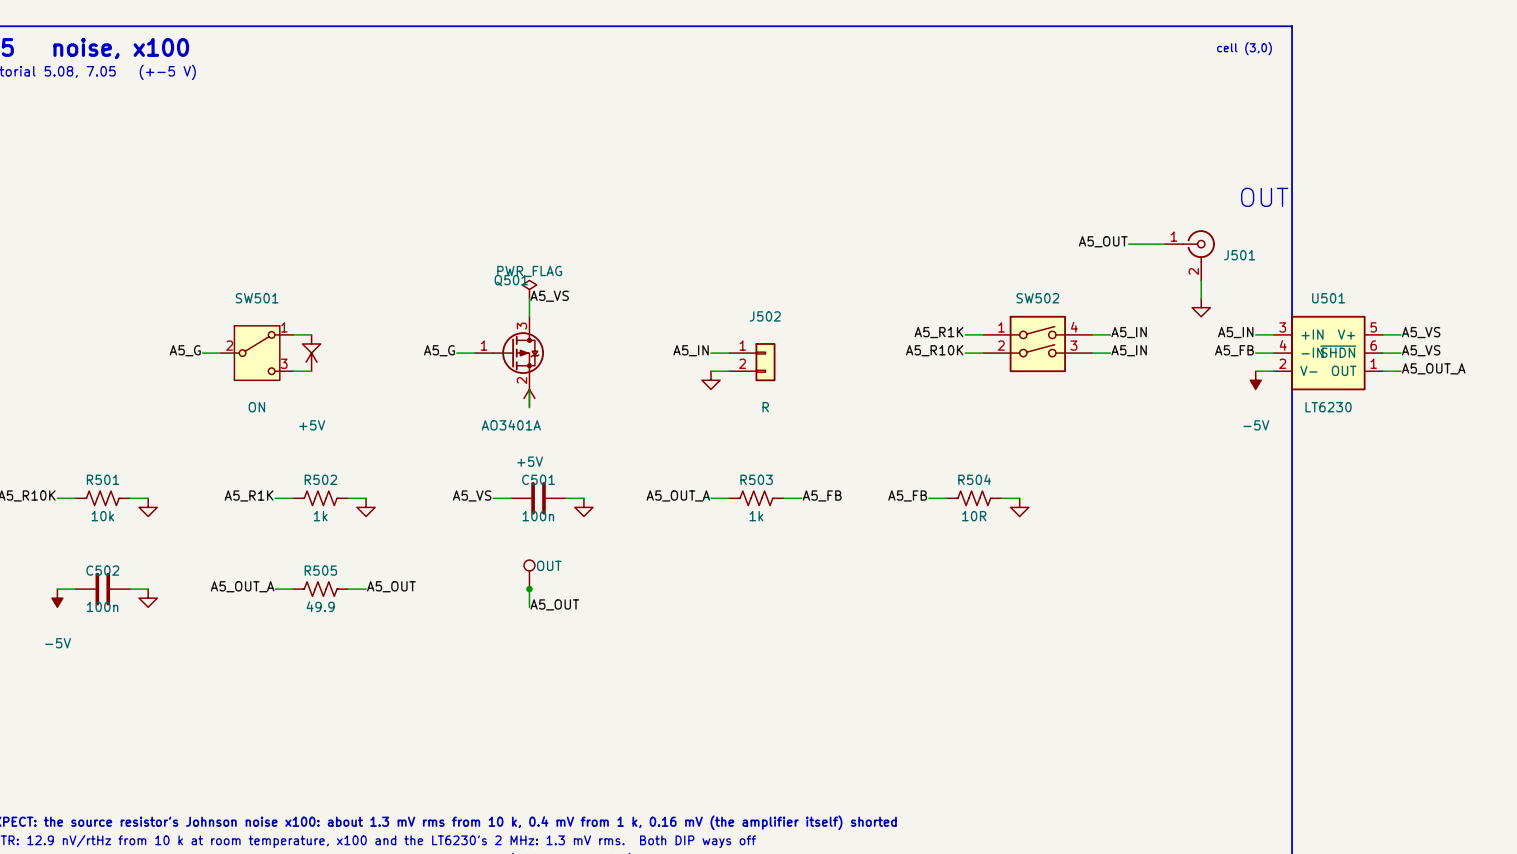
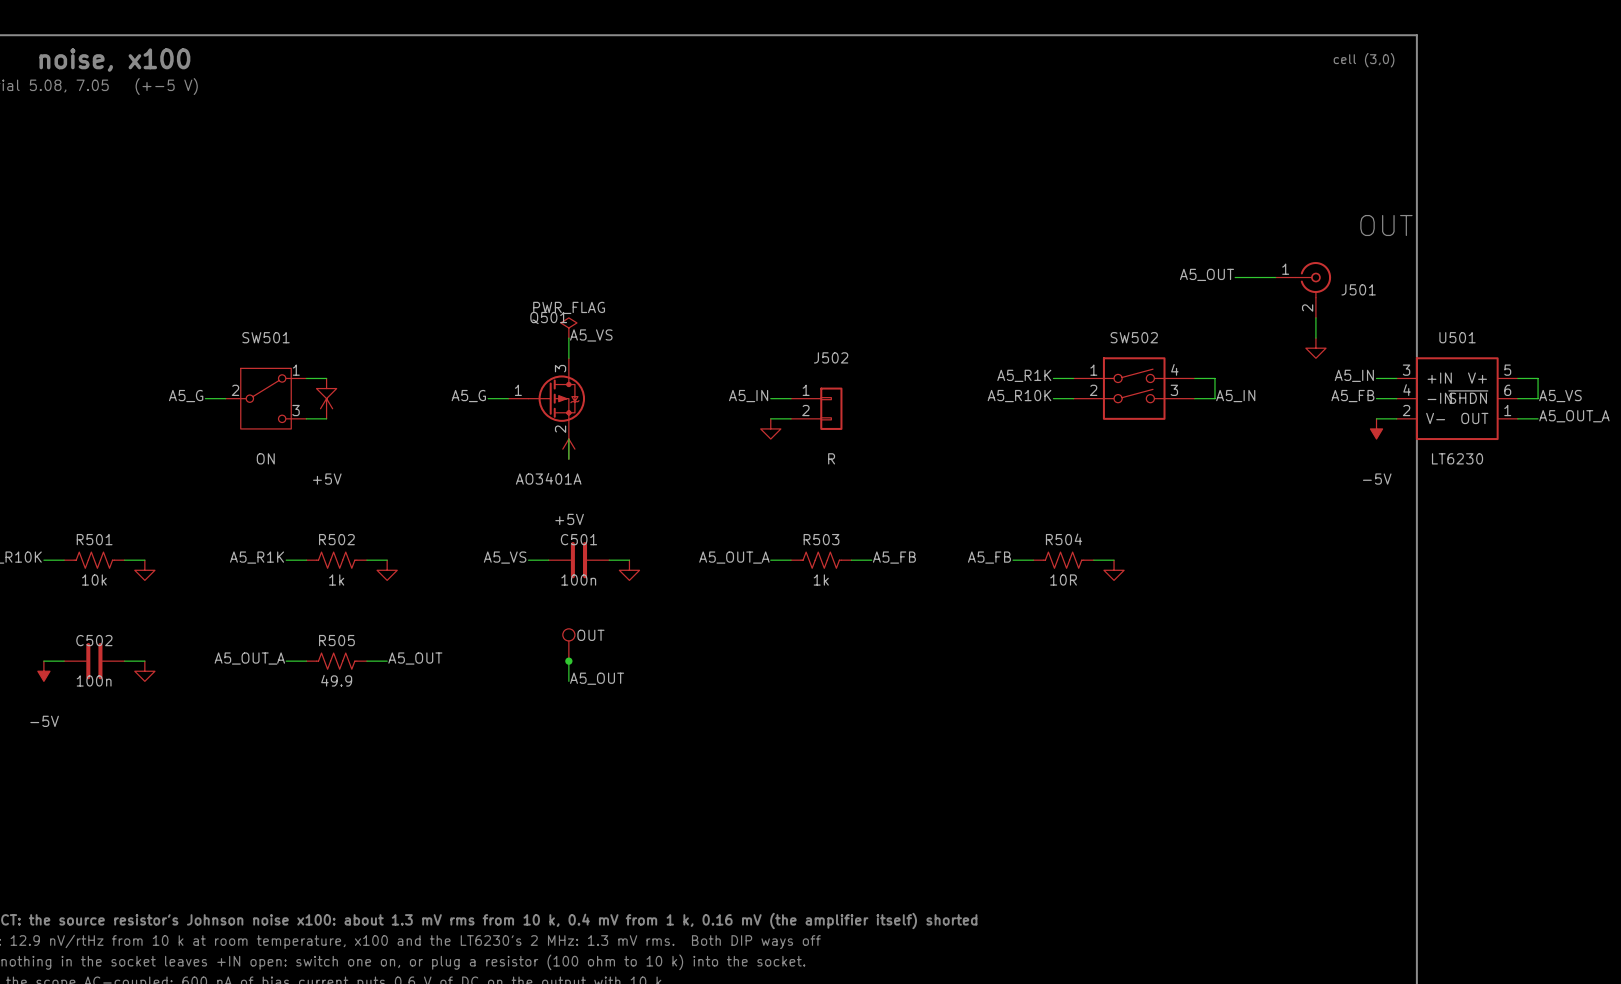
label: A5_IN (1129, 332) -> none
label: A5_VS (1421, 332) -> none
wire: none -> (1214, 378) (1214, 398)
wire: none -> (1538, 378) (1538, 398)

